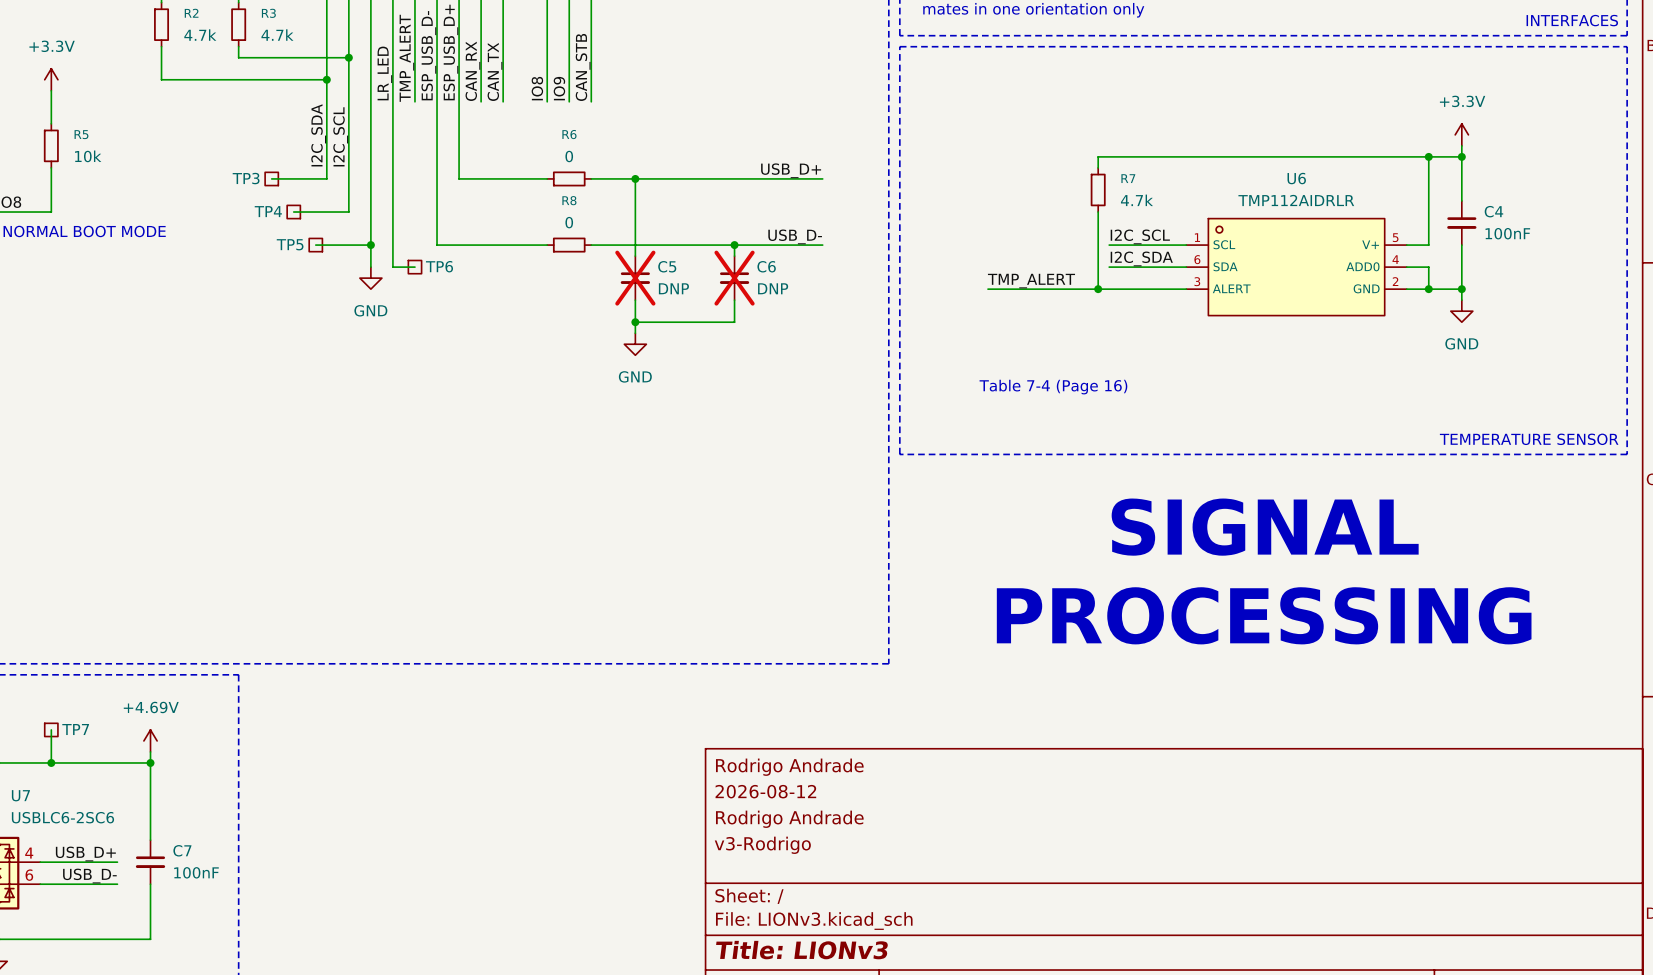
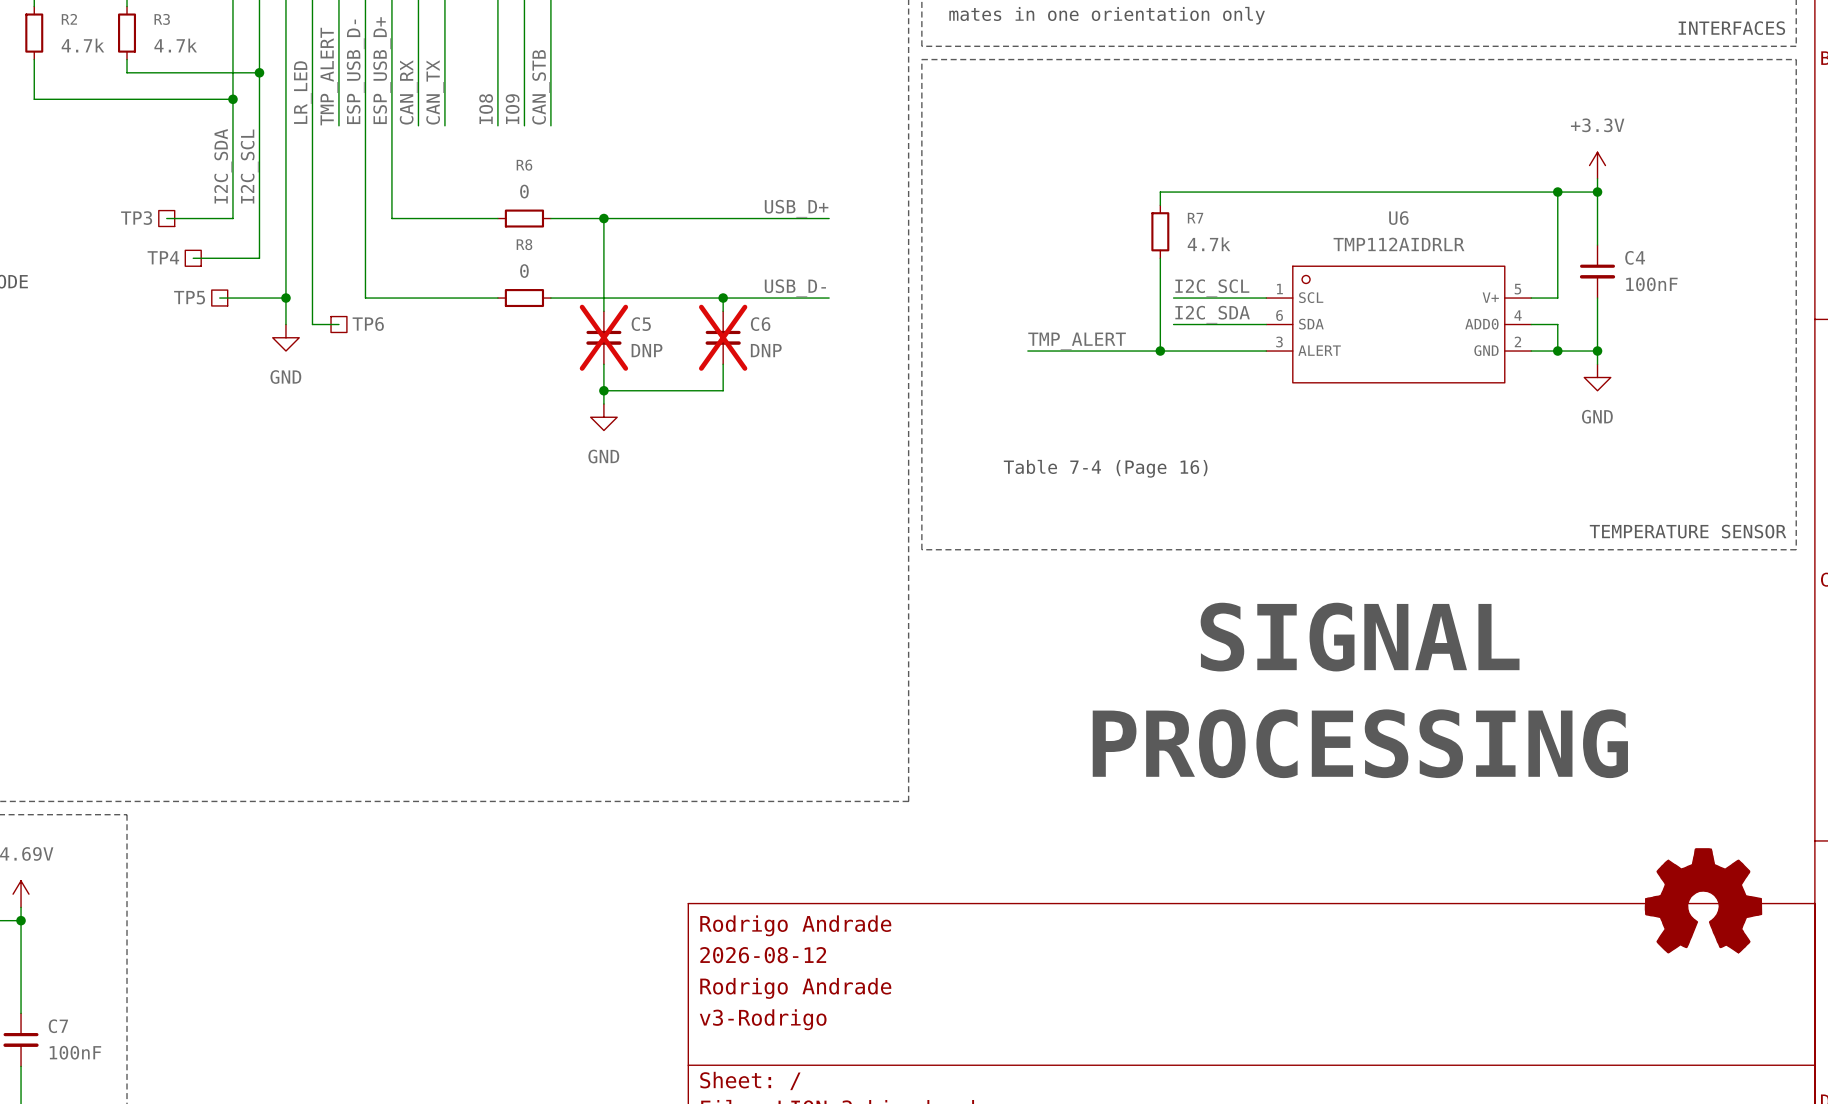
part: none -> (1703, 900)

